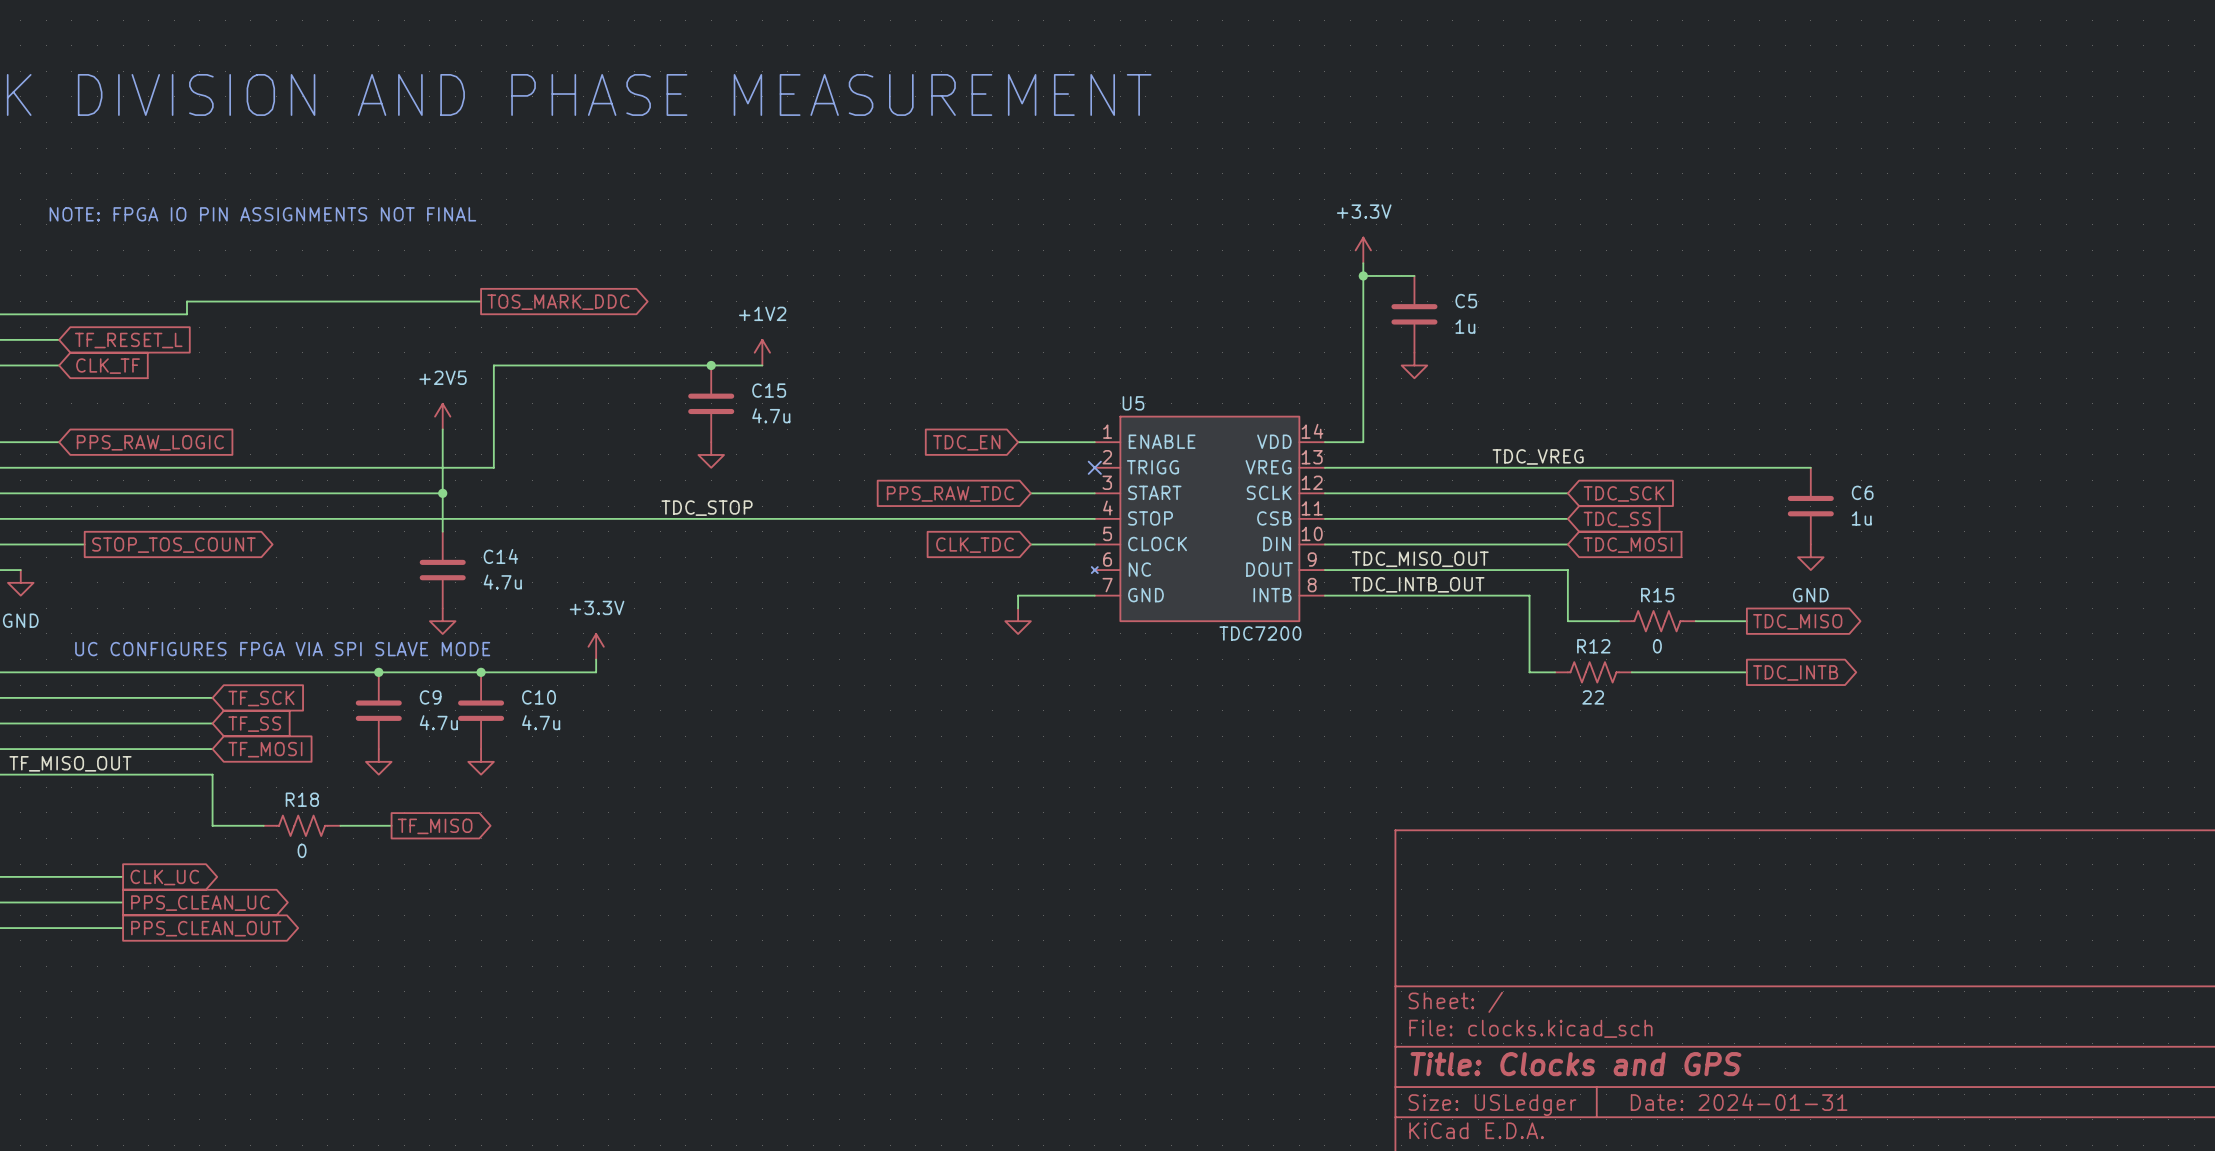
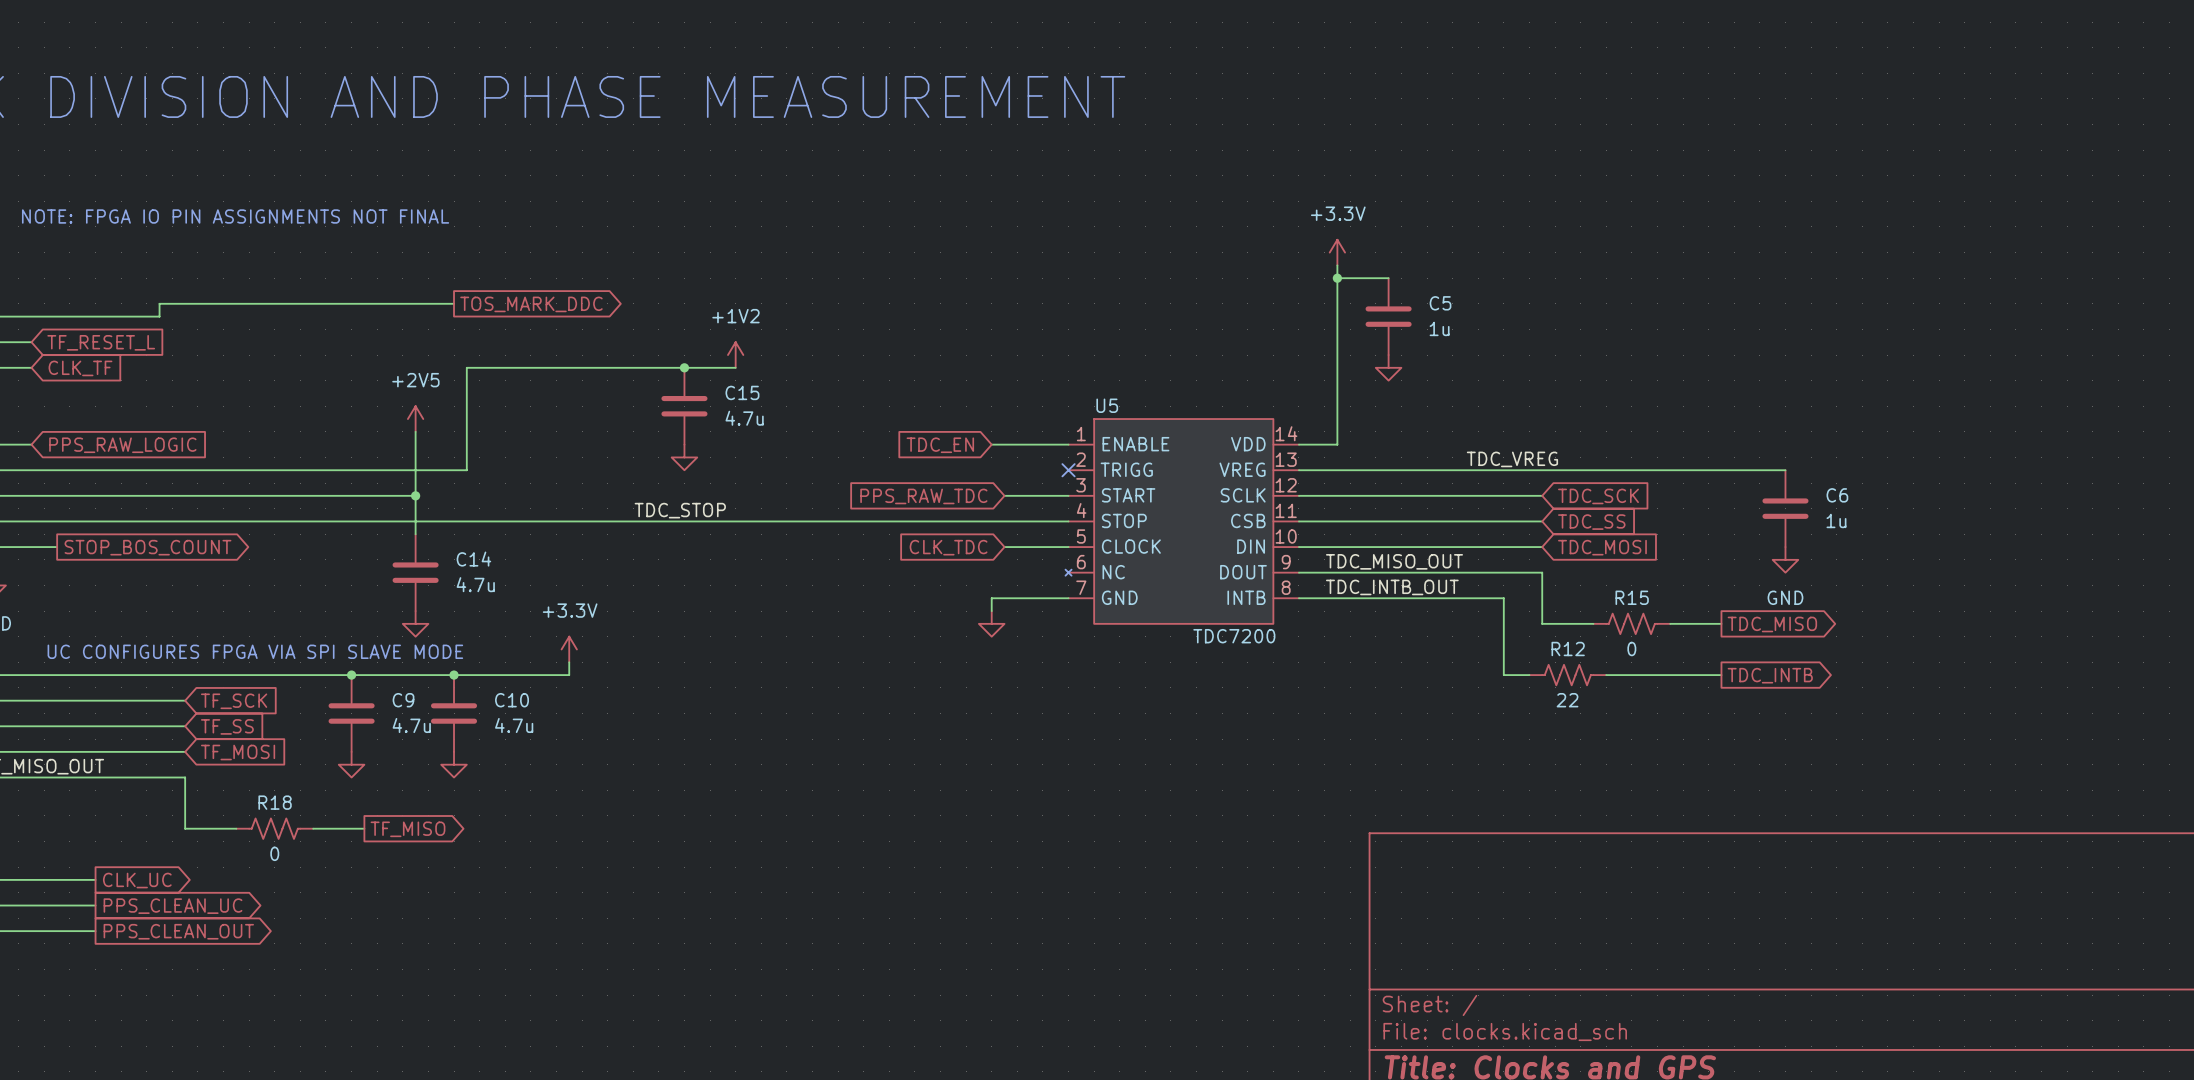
global label: STOP_TOS_COUNT (173, 545) -> STOP_BOS_COUNT (147, 547)

